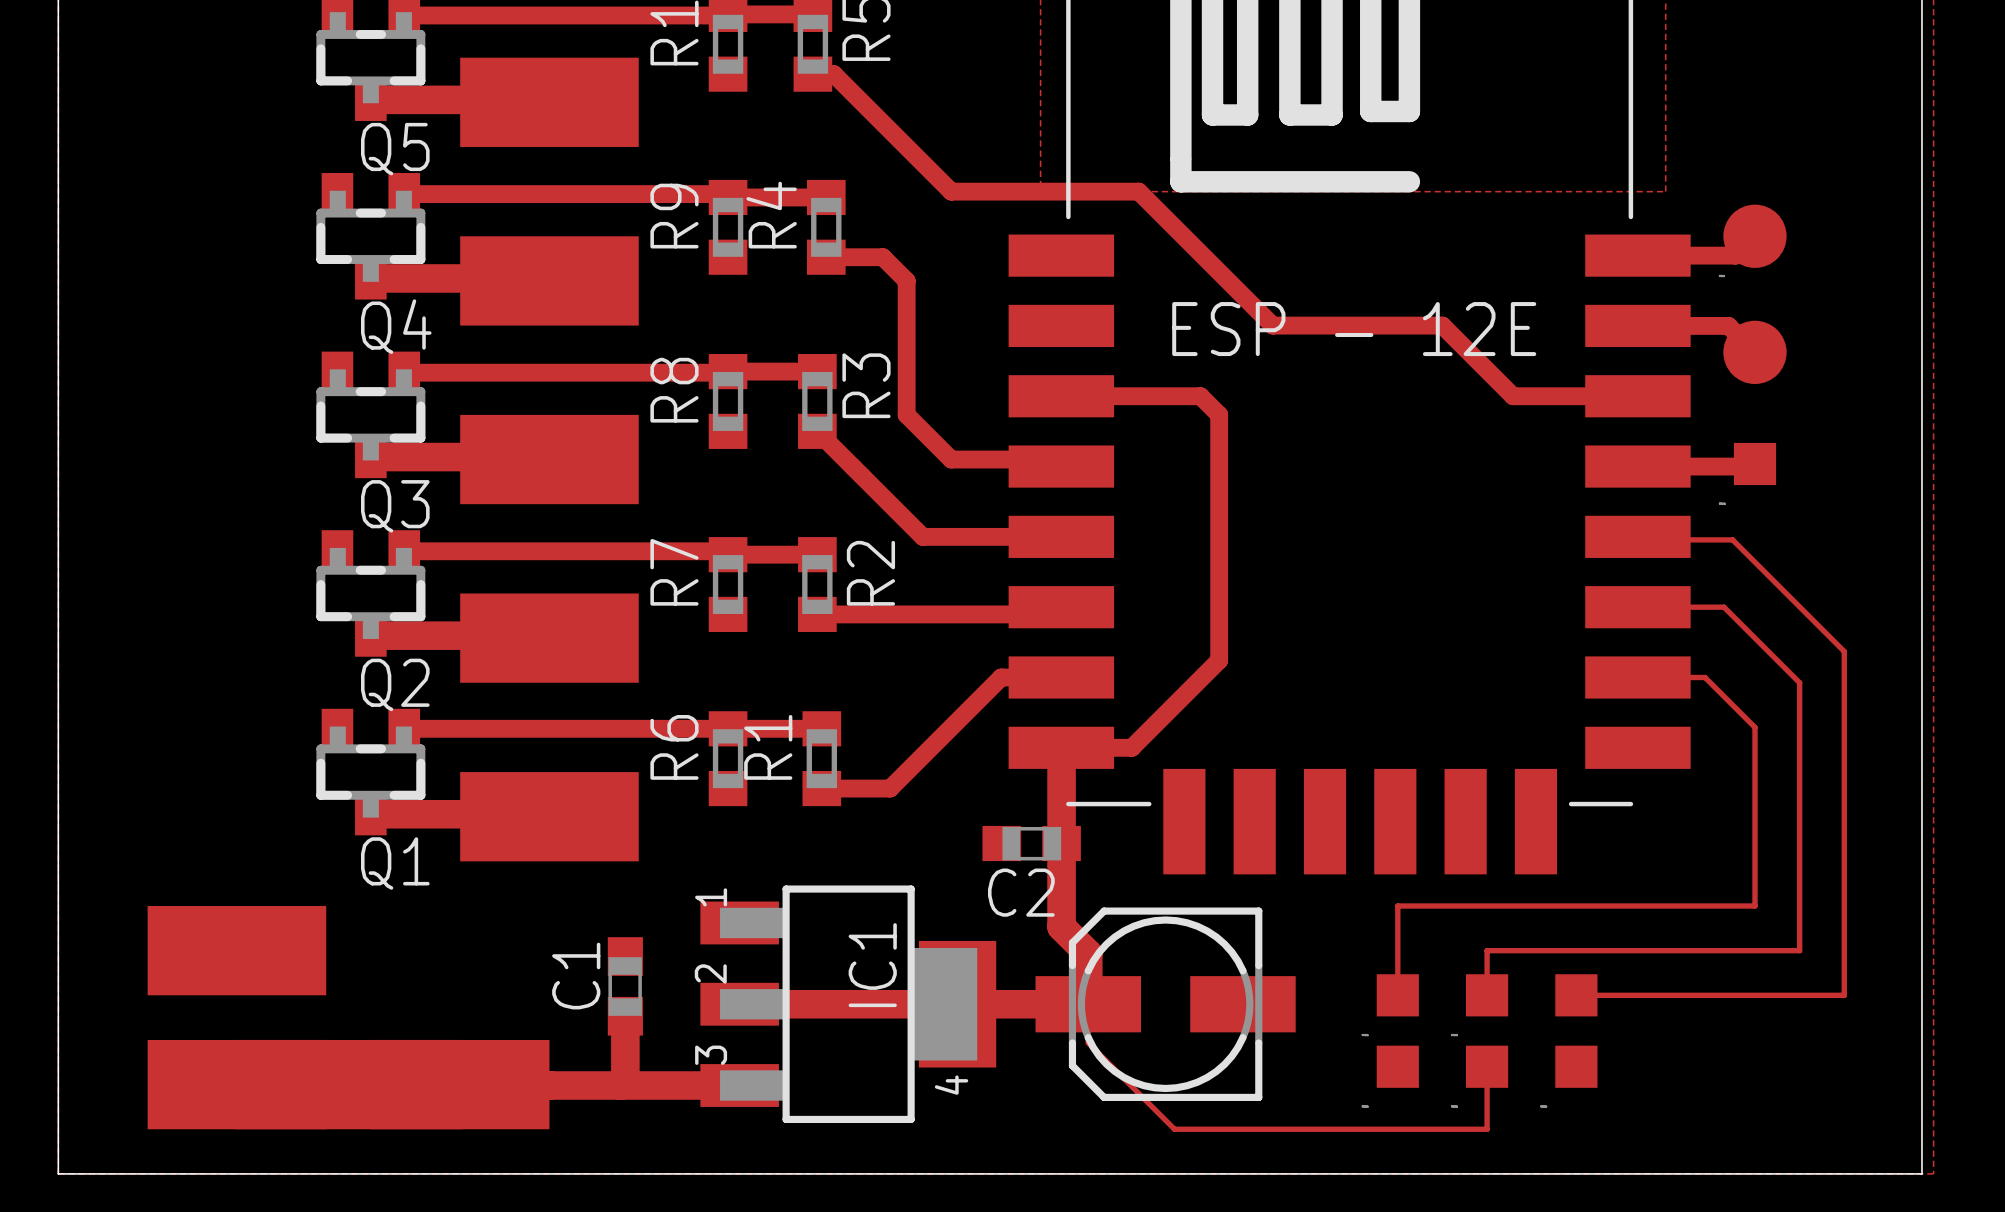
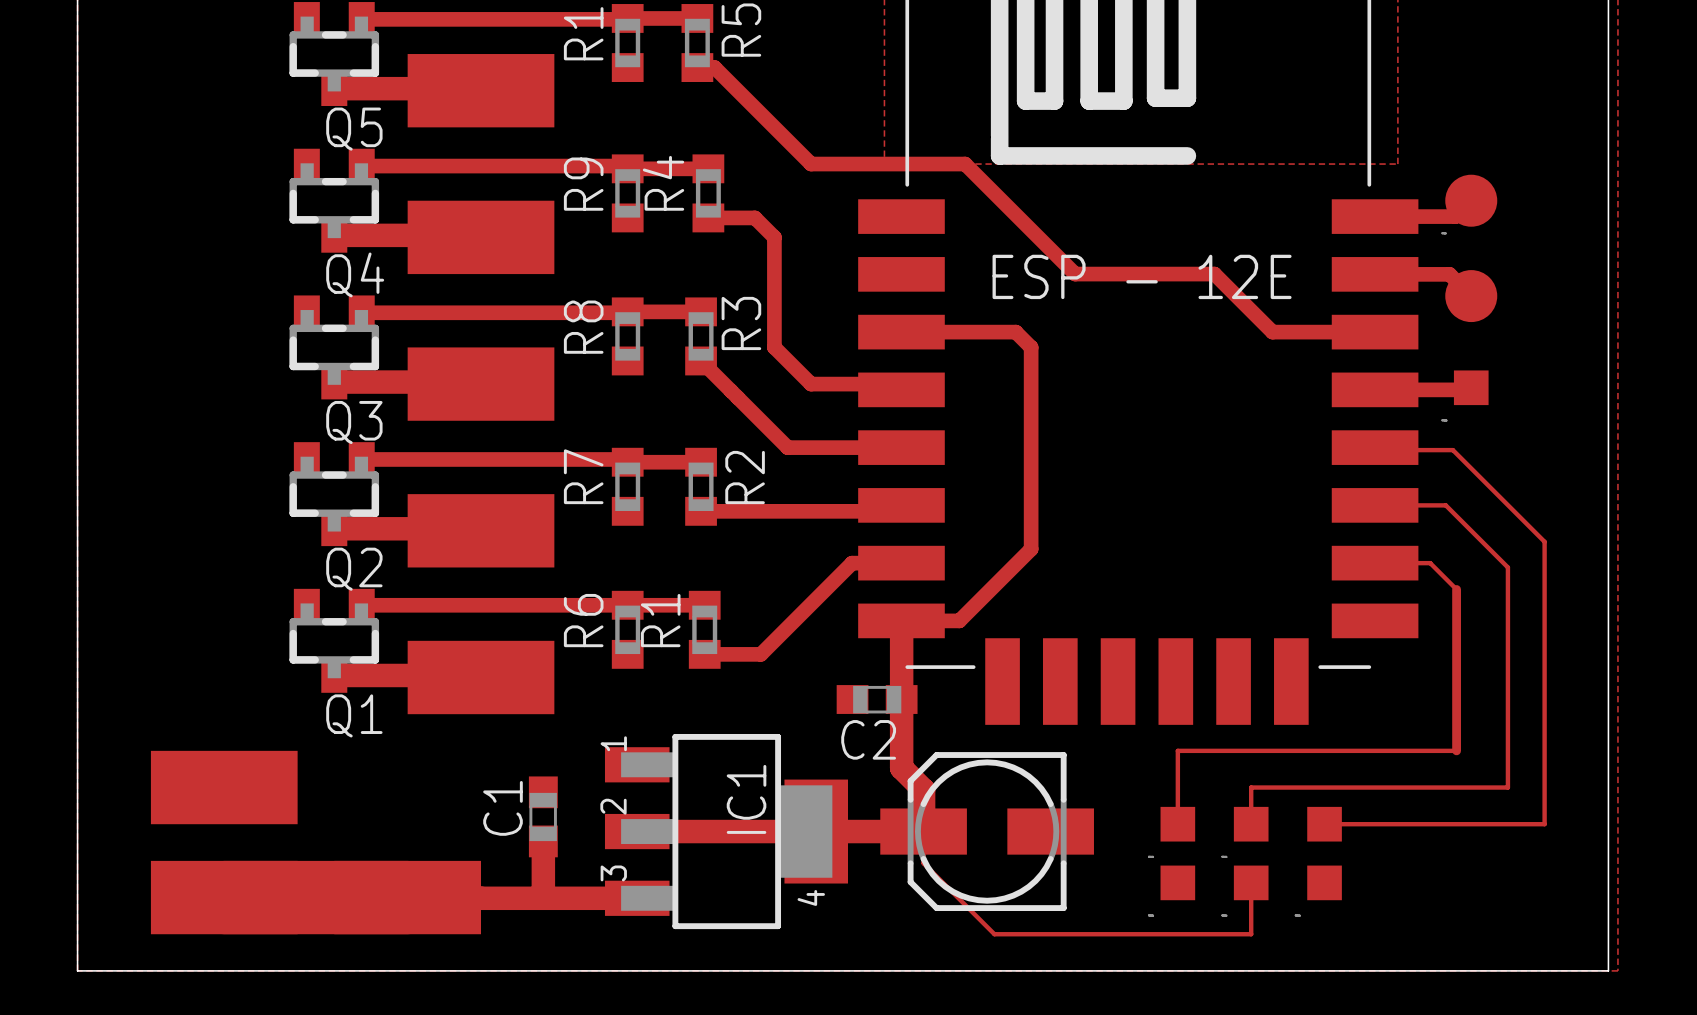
track: (1737, 709) (1754, 727) (1754, 906) (1737, 906) -> (1456, 589) (1456, 750)

